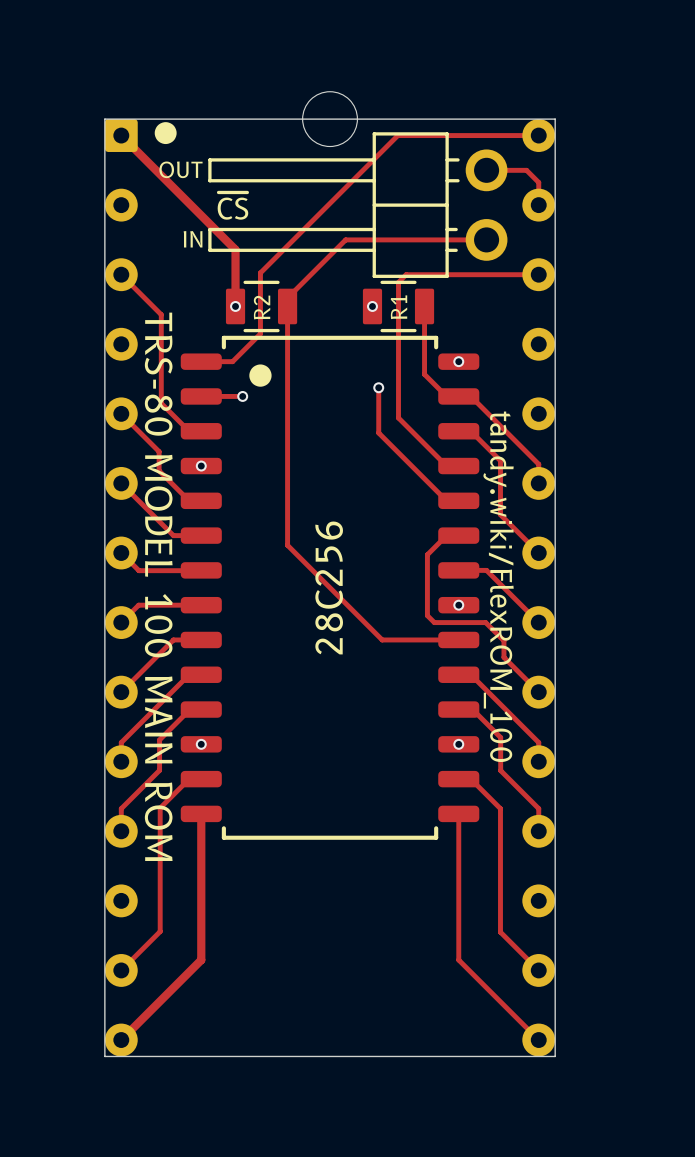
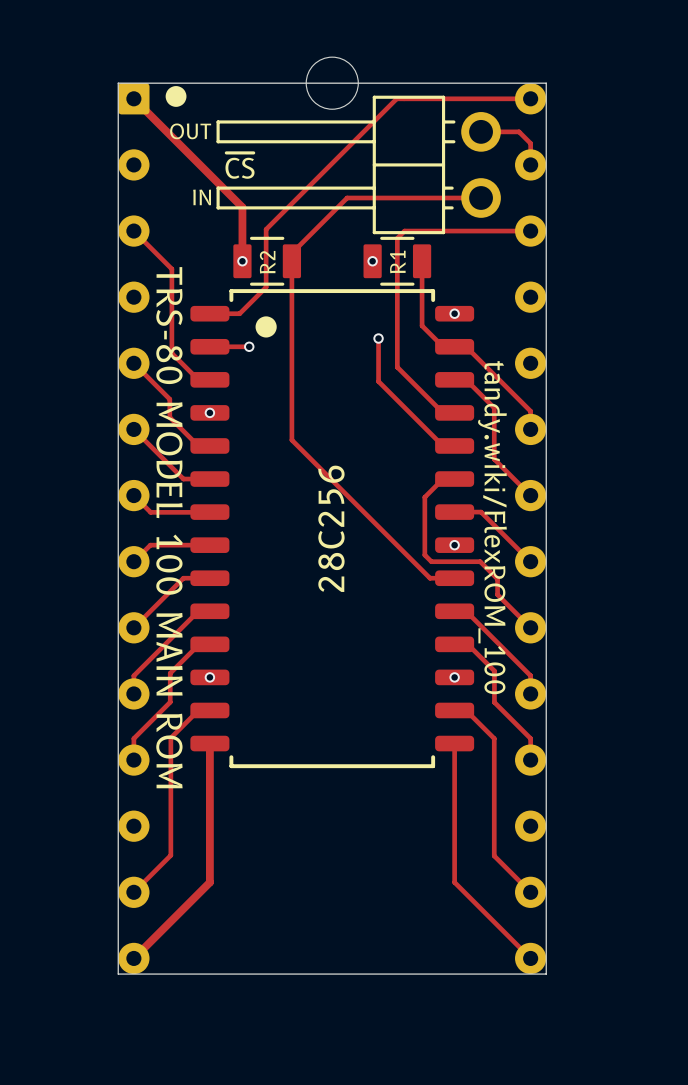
track: (287, 494) (287, 545) (382, 639) (432, 639) -> (291, 440) (430, 578)

